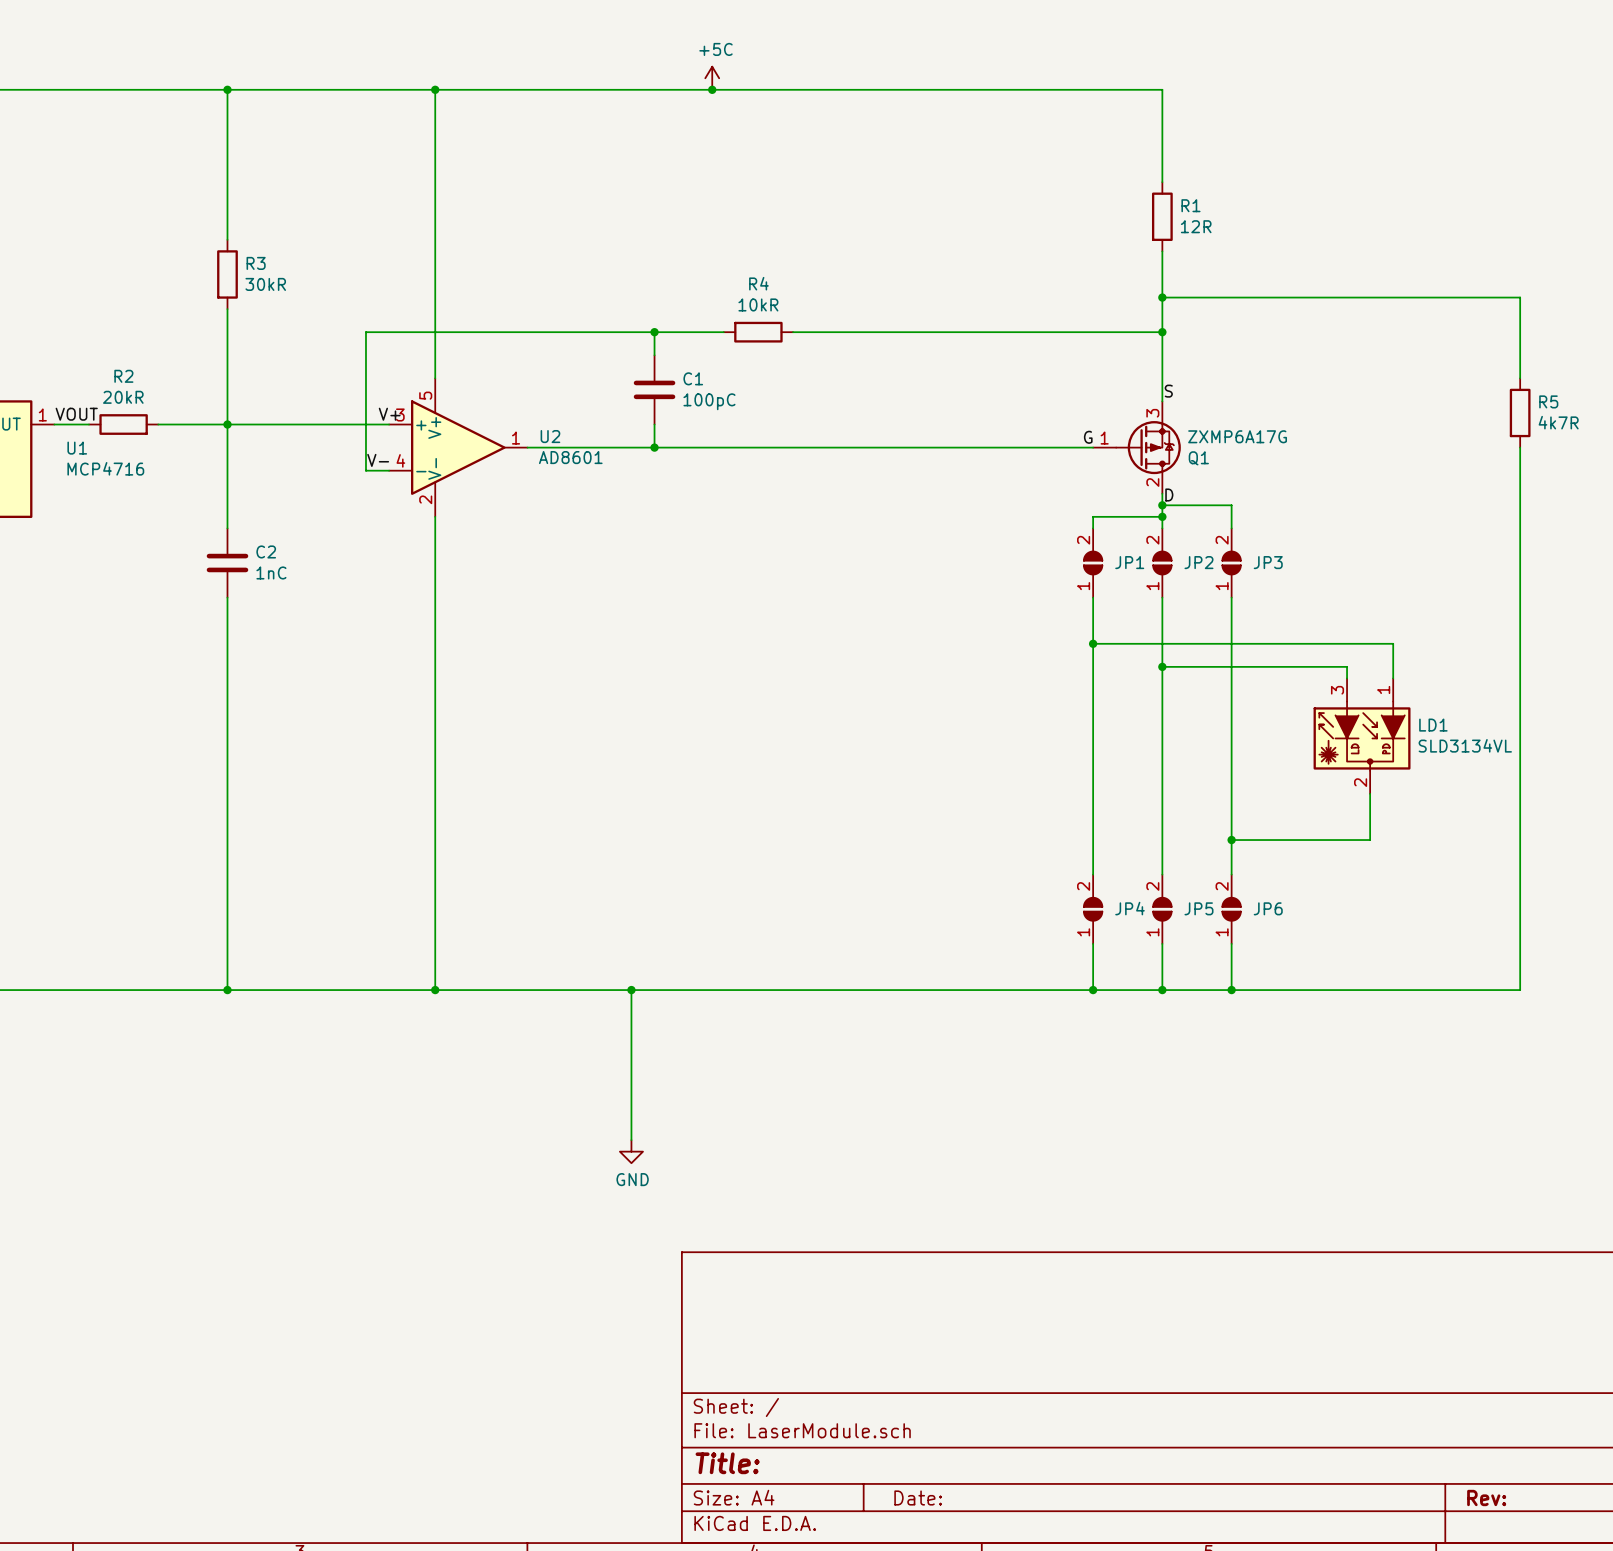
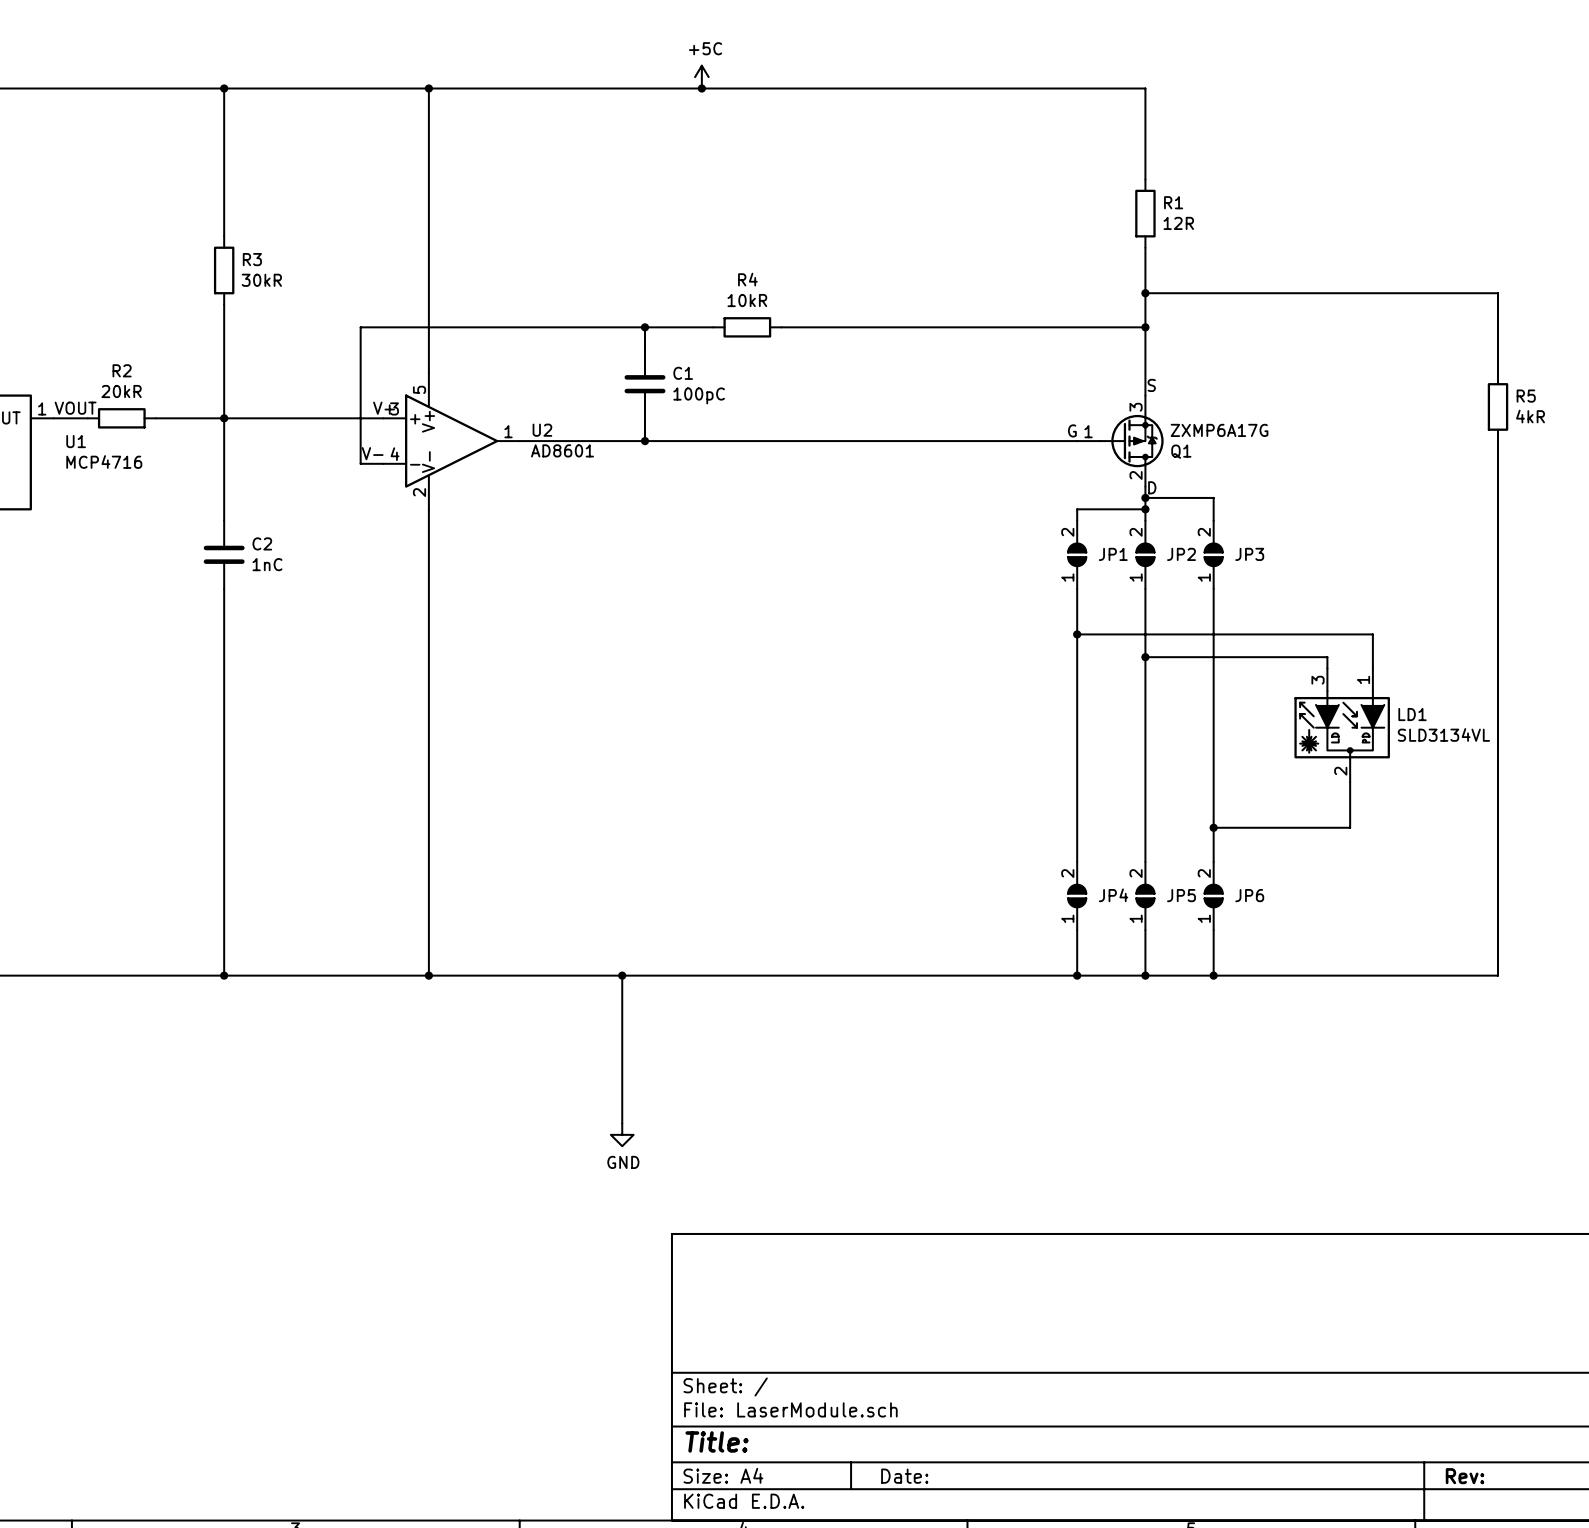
R5 value: 4k7R (1558, 422) -> 4kR (1530, 416)

